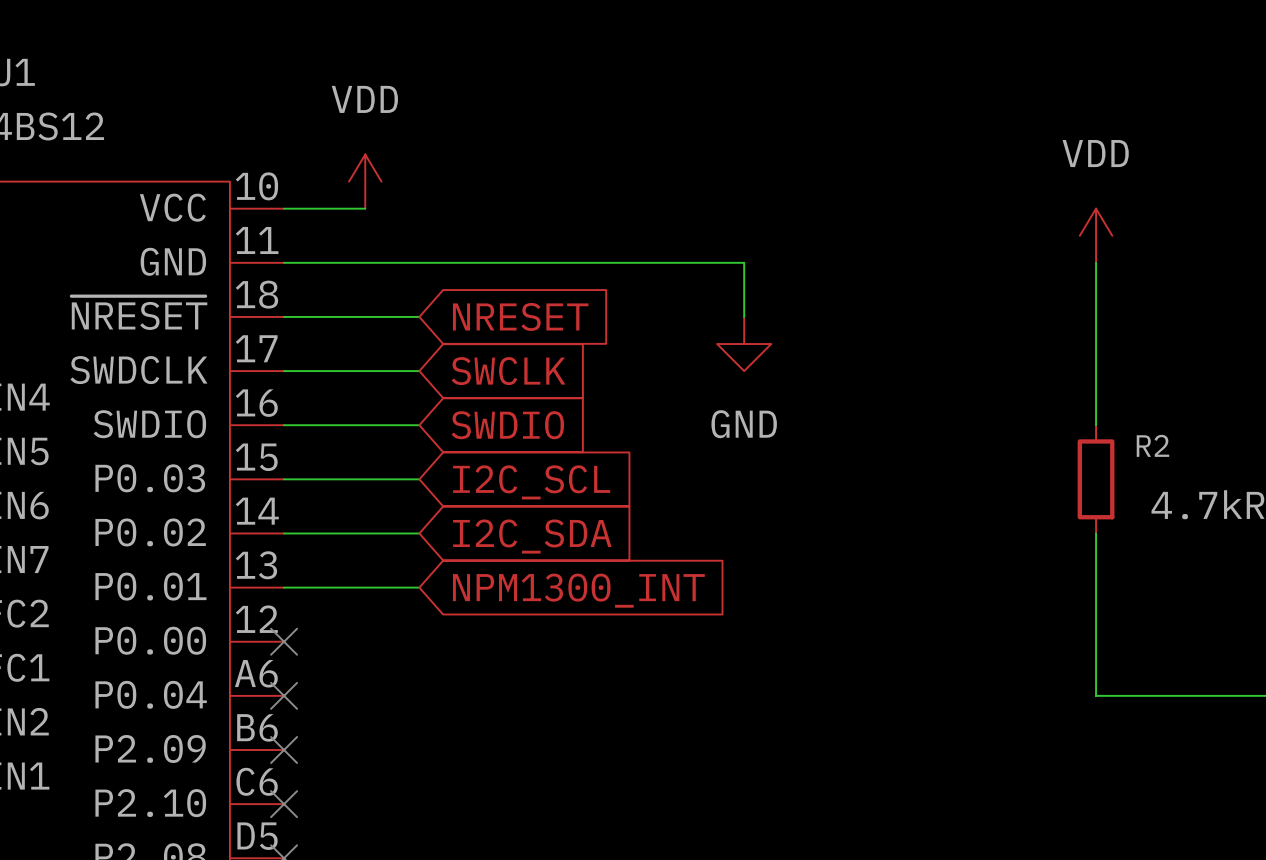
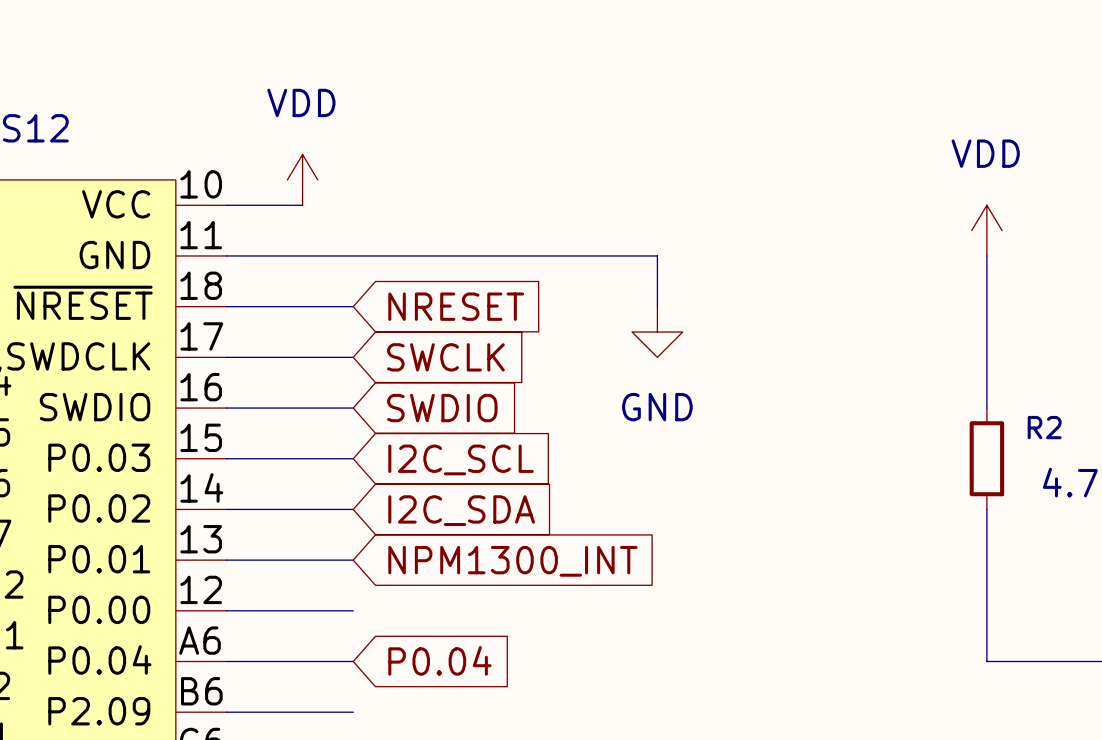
wire: none -> (226, 610) (353, 610)
no-connect mark: (284, 641) -> none
wire: none -> (226, 661) (353, 661)
no-connect mark: (284, 695) -> none
global label: none -> P0.04 (439, 660)
wire: none -> (226, 712) (353, 712)
no-connect mark: (284, 750) -> none

